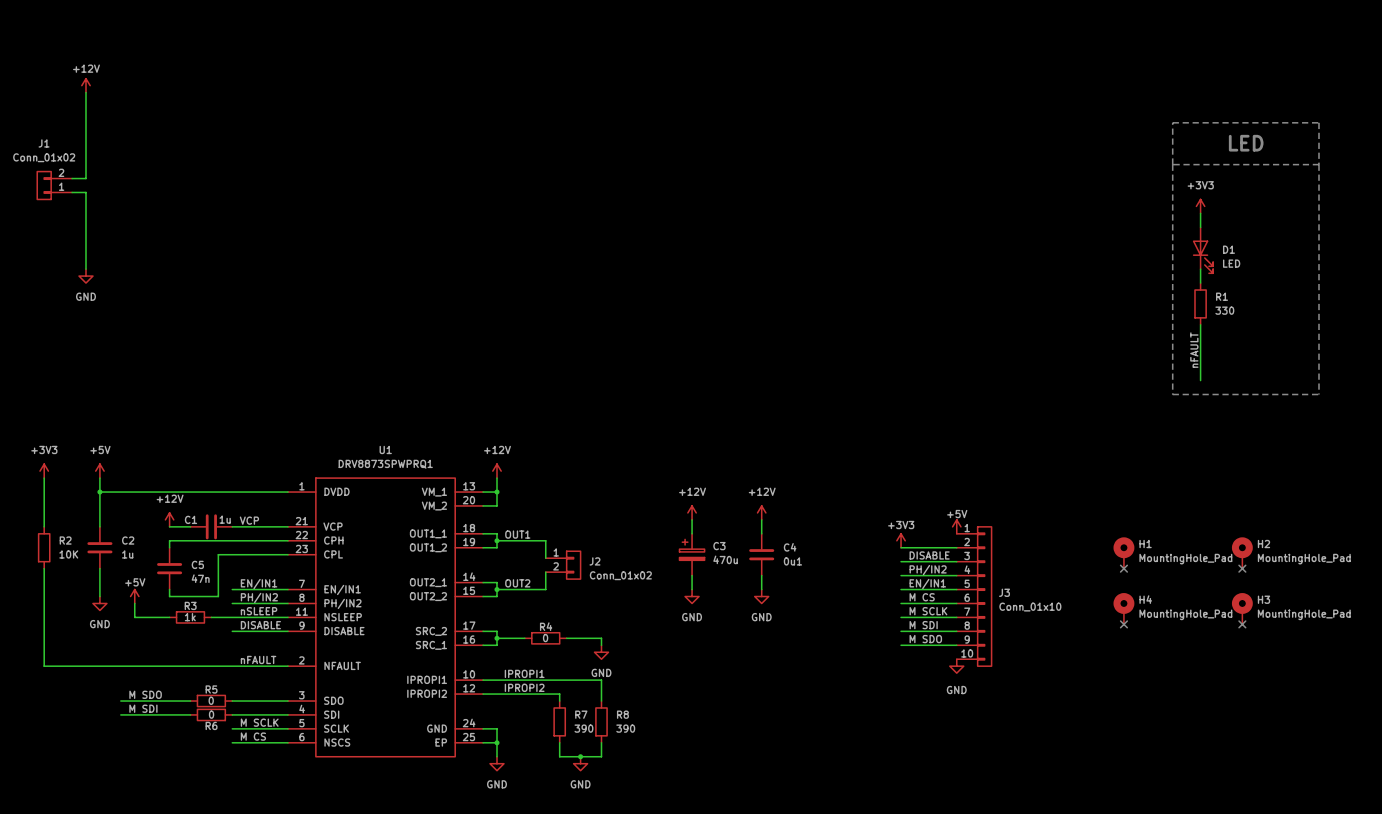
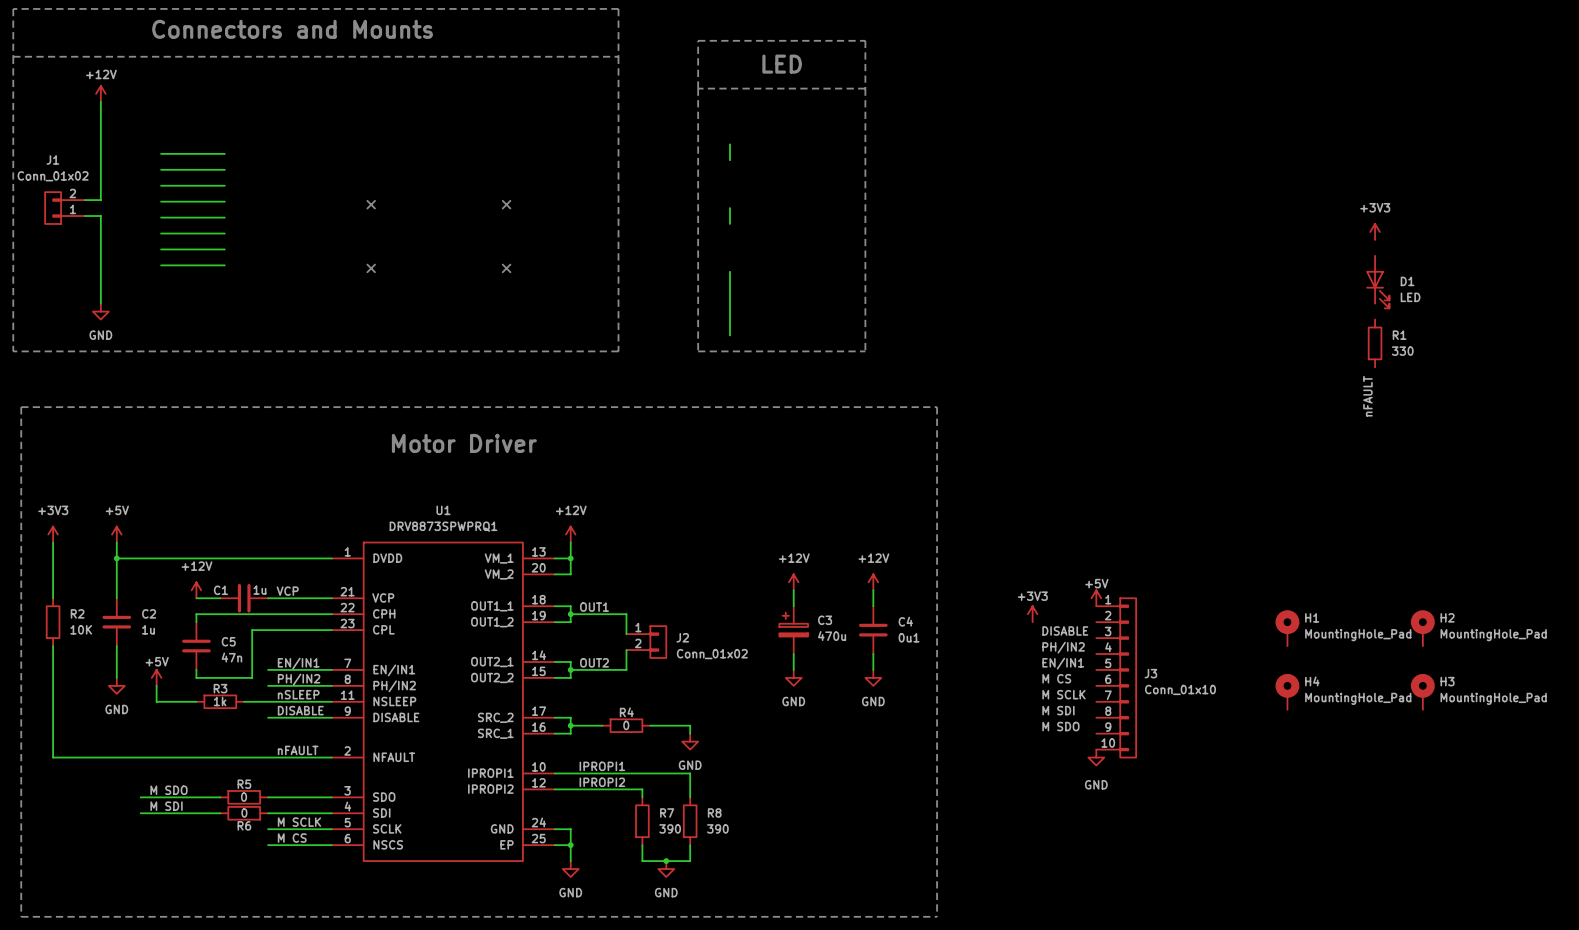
line: none -> (13, 8) (13, 351) (618, 351) (618, 8) (13, 8)
text: none -> Connectors and Mounts (292, 29)
line: none -> (698, 40) (698, 351) (865, 351) (865, 40) (698, 40)
line: none -> (13, 56) (618, 56)
text: none -> LED (782, 64)
line: none -> (698, 88) (865, 88)
line: (1172, 122) (1172, 394) (1318, 394) (1318, 122) (1172, 122) -> none
wire: none -> (730, 144) (730, 160)
wire: none -> (161, 153) (224, 153)
text: LED (1246, 143) -> none
wire: none -> (161, 169) (224, 169)
line: (1172, 164) (1318, 164) -> none
wire: none -> (161, 185) (224, 185)
wire: none -> (161, 201) (224, 201)
no-connect mark: none -> (371, 204)
no-connect mark: none -> (506, 204)
wire: none -> (730, 208) (730, 223)
wire: none -> (161, 217) (224, 217)
wire: none -> (161, 233) (224, 233)
wire: (1200, 213) (1200, 227) -> none
wire: none -> (161, 249) (224, 249)
wire: none -> (161, 265) (224, 265)
no-connect mark: none -> (371, 268)
no-connect mark: none -> (506, 268)
wire: none -> (730, 271) (730, 335)
wire: (1200, 269) (1200, 283) -> none
wire: (1200, 324) (1200, 380) -> none
line: none -> (21, 407) (937, 407) (937, 916) (21, 916) (21, 407)
text: none -> Motor Driver (464, 443)
wire: (901, 547) (956, 547) -> none
wire: (901, 561) (956, 561) -> none
no-connect mark: (1123, 568) -> none
no-connect mark: (1242, 568) -> none
wire: (901, 575) (956, 575) -> none
wire: (901, 589) (956, 589) -> none
wire: (901, 603) (956, 603) -> none
wire: (901, 617) (956, 617) -> none
no-connect mark: (1123, 624) -> none
no-connect mark: (1242, 624) -> none
wire: (901, 631) (956, 631) -> none
wire: (901, 645) (956, 645) -> none

